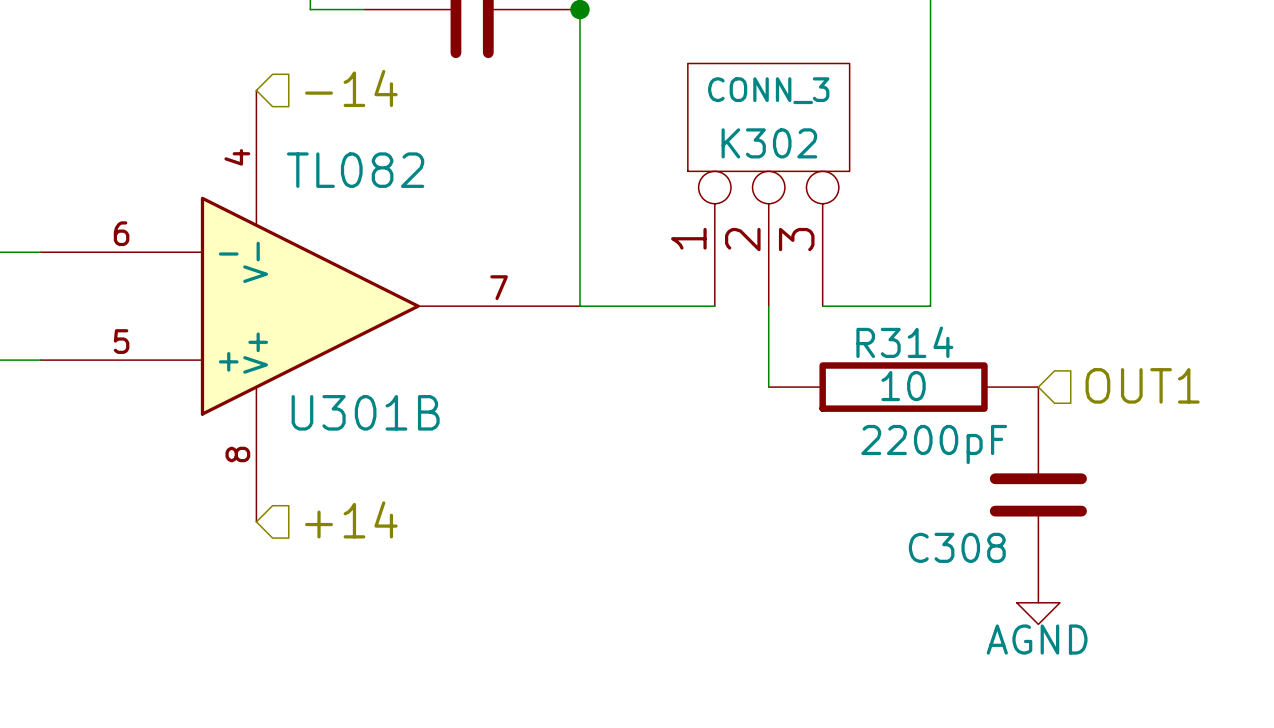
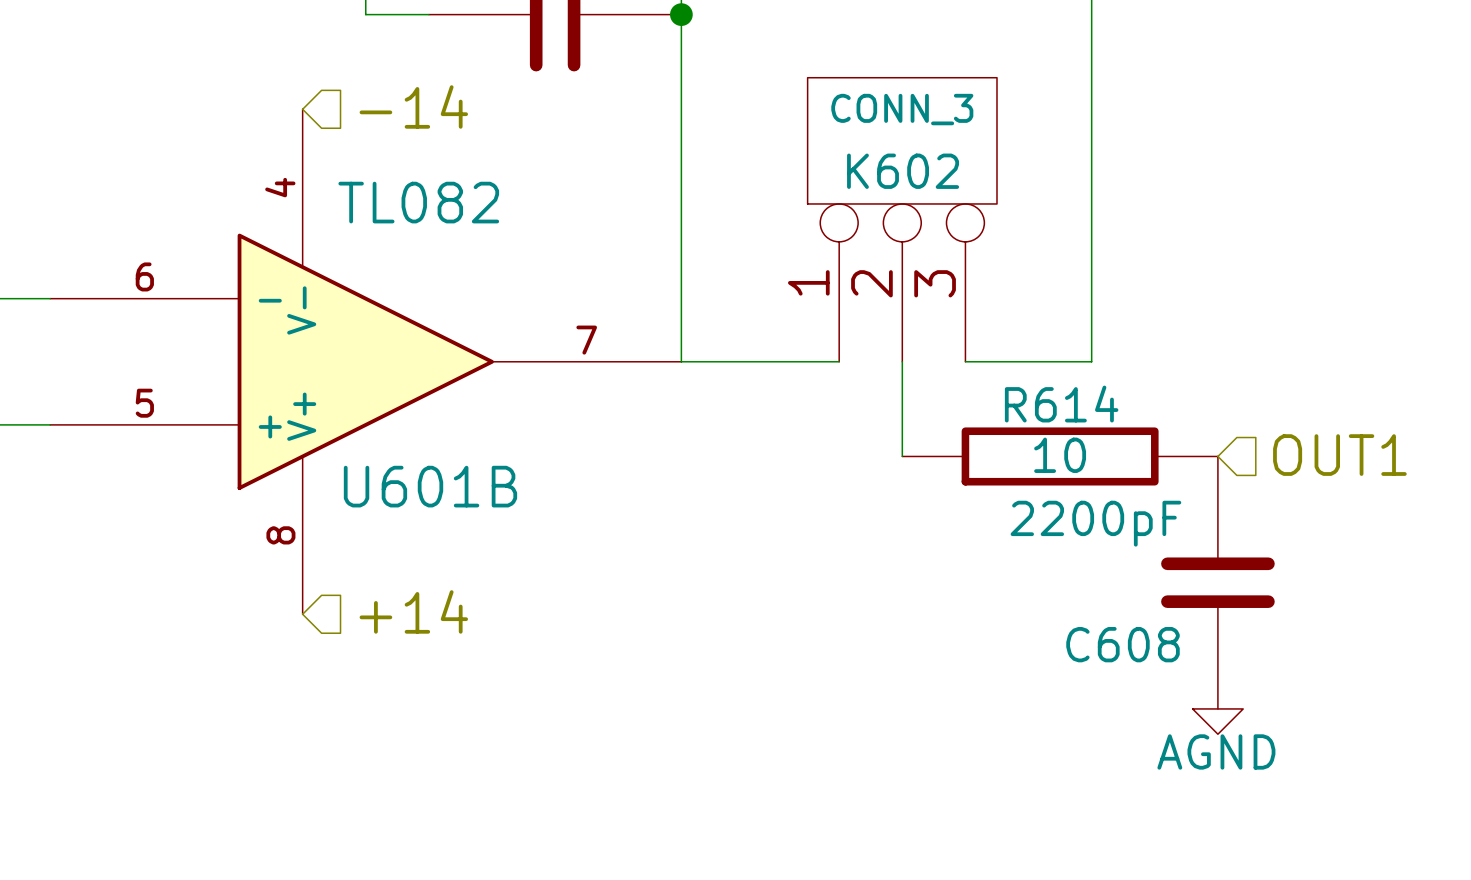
K302 name: K302 (769, 143) -> K602 (903, 171)
R314 name: R314 (904, 342) -> R614 (1061, 404)
U301B name: U301B (365, 412) -> U601B (430, 486)
C308 name: C308 (957, 547) -> C608 (1123, 644)

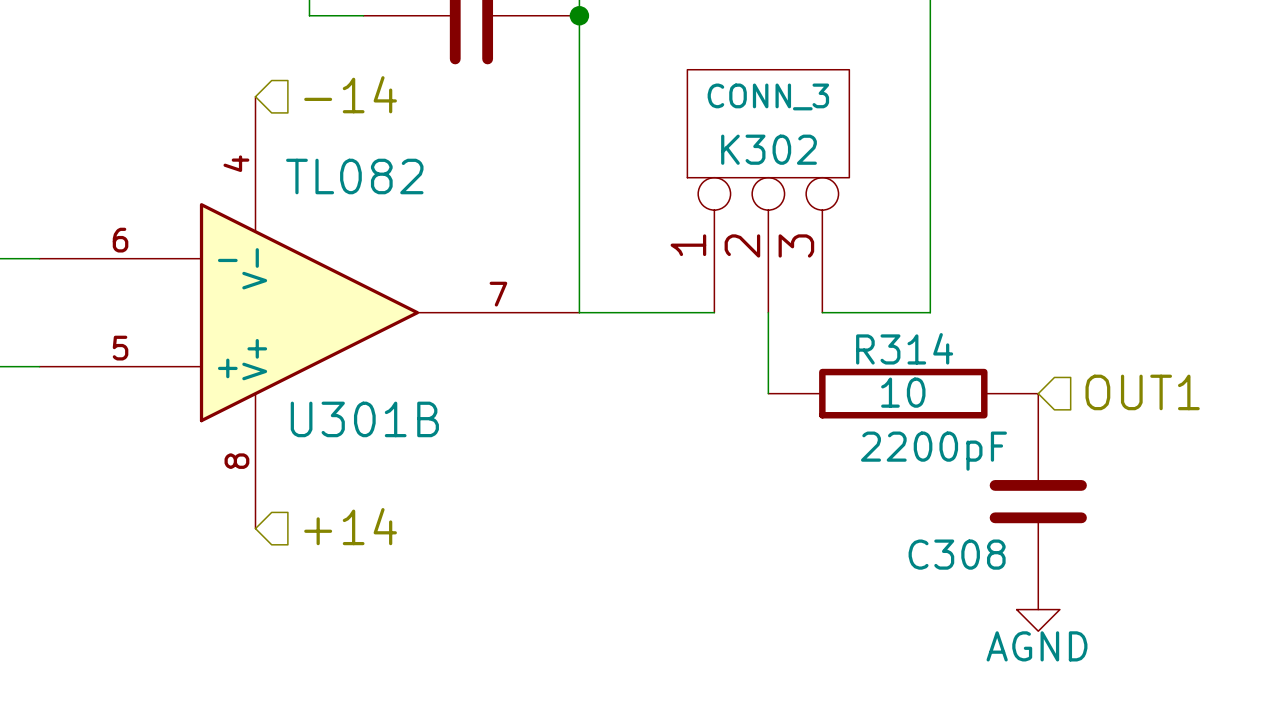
K602 name: K602 (903, 171) -> K302 (769, 149)
R614 name: R614 (1061, 404) -> R314 (904, 348)
U601B name: U601B (430, 486) -> U301B (364, 419)
C608 name: C608 (1123, 644) -> C308 (957, 554)

